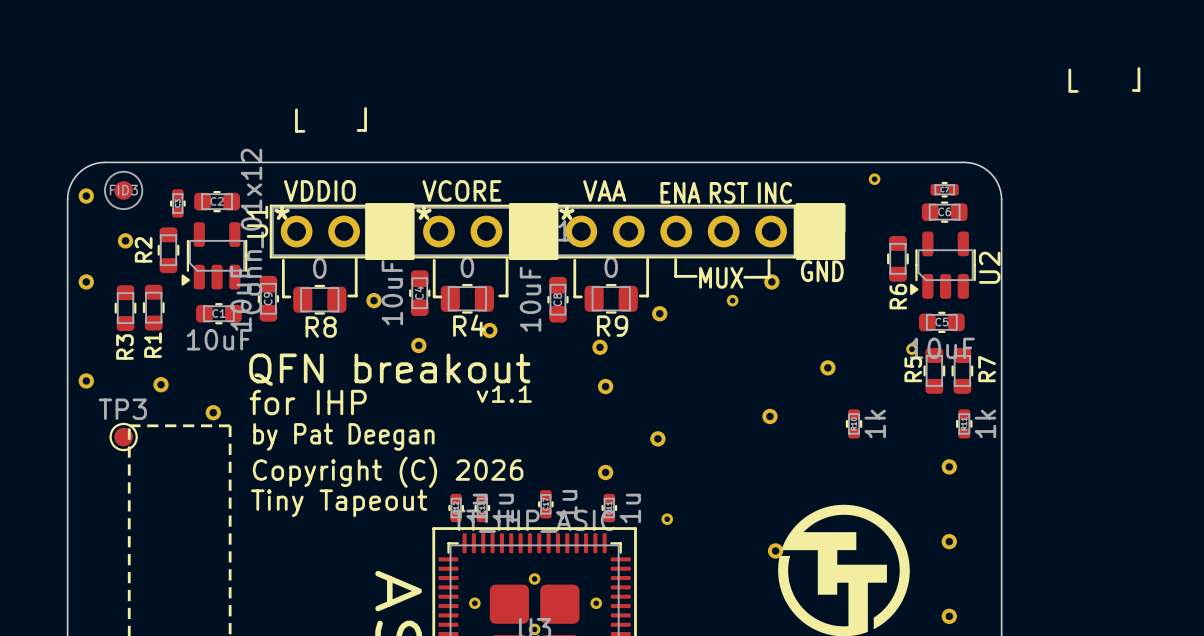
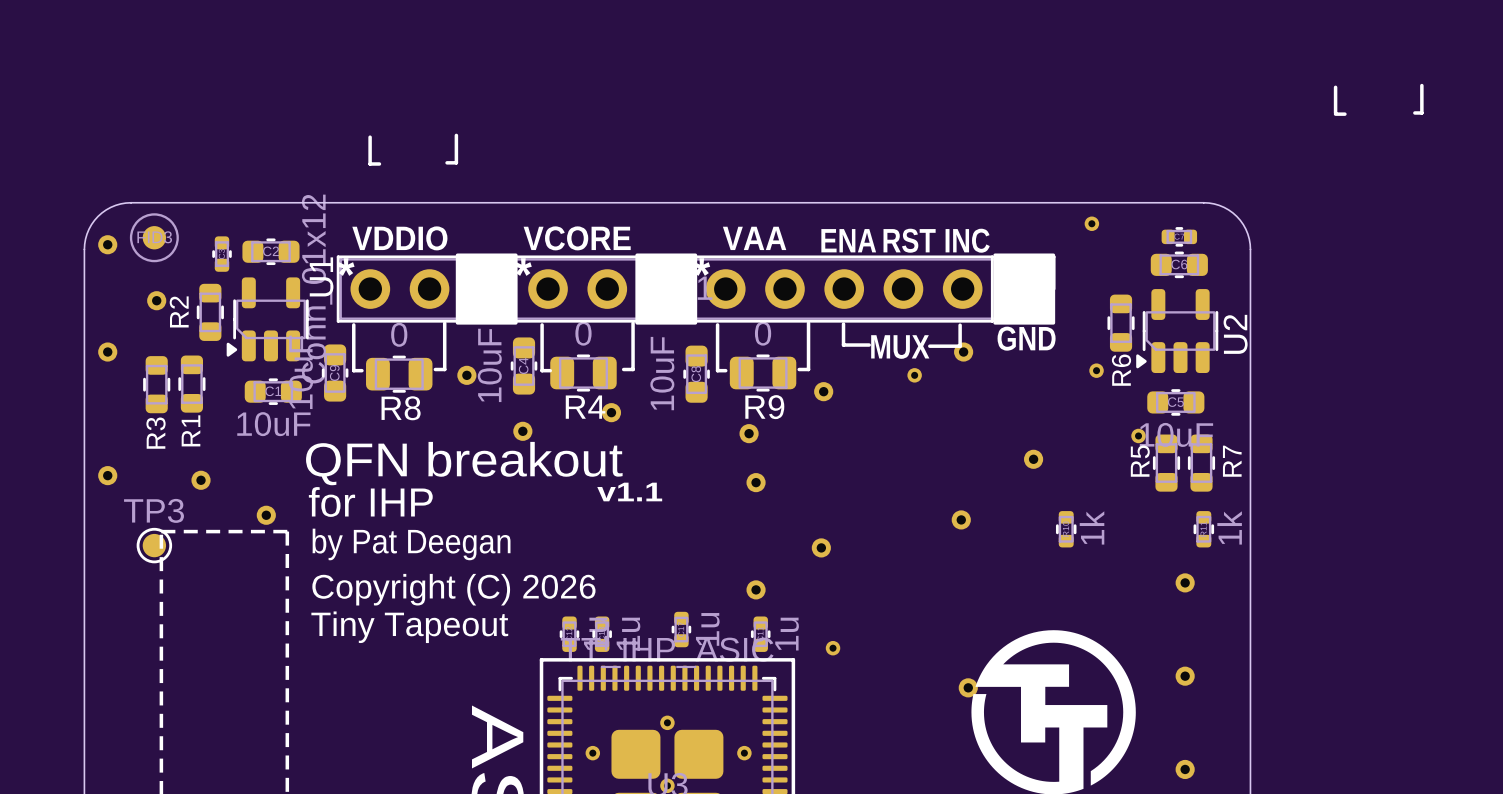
part: none -> (1096, 370)

